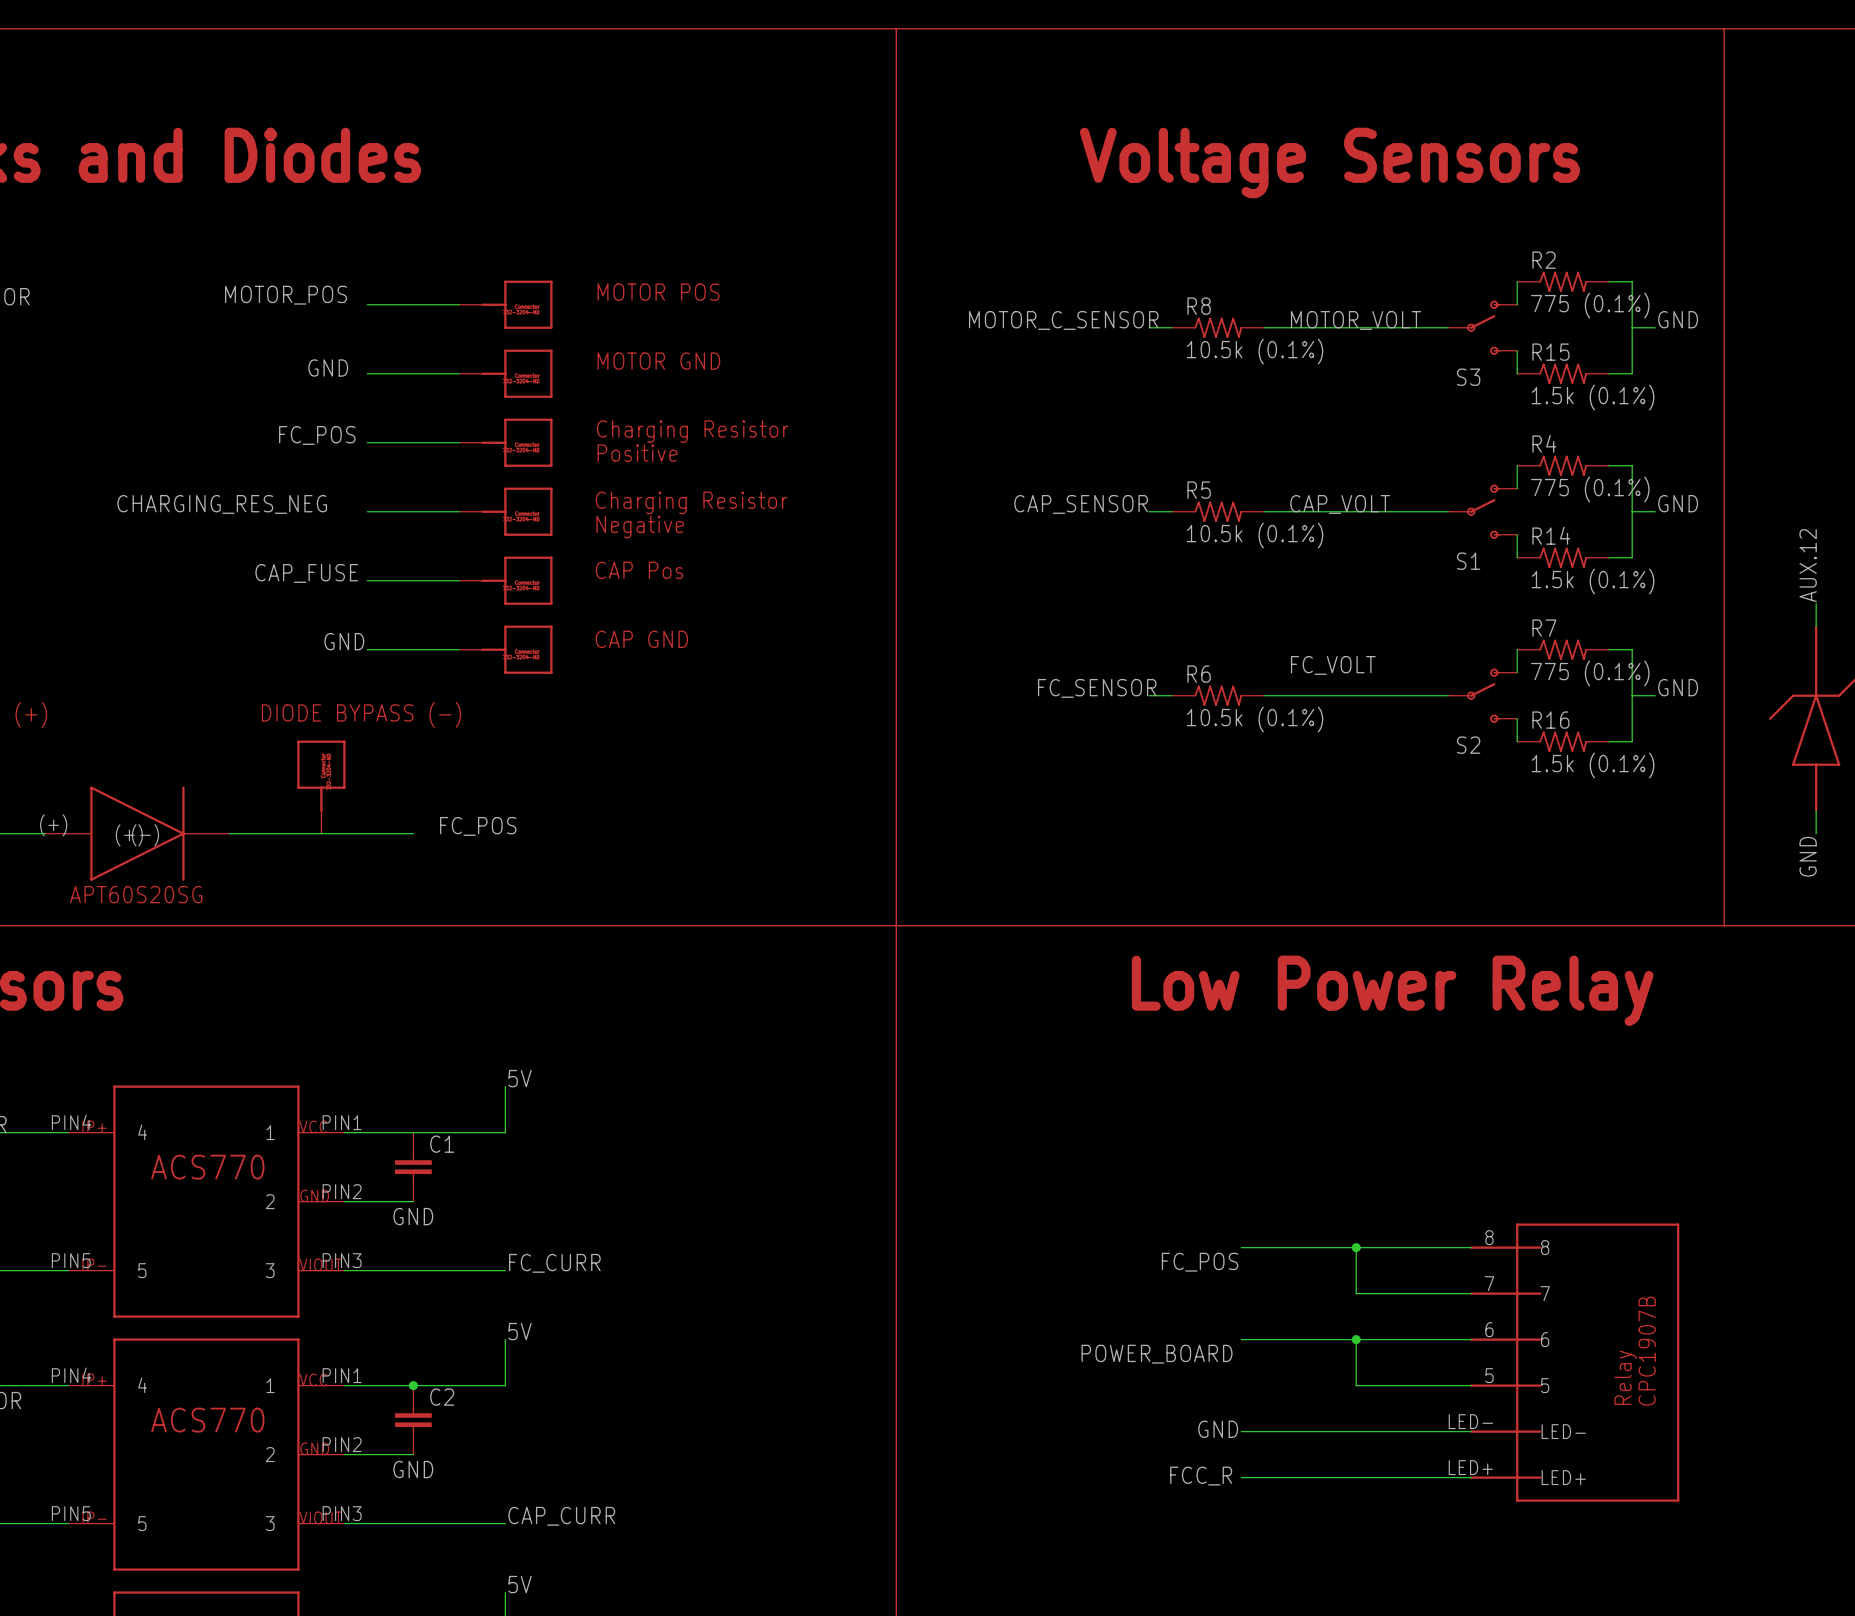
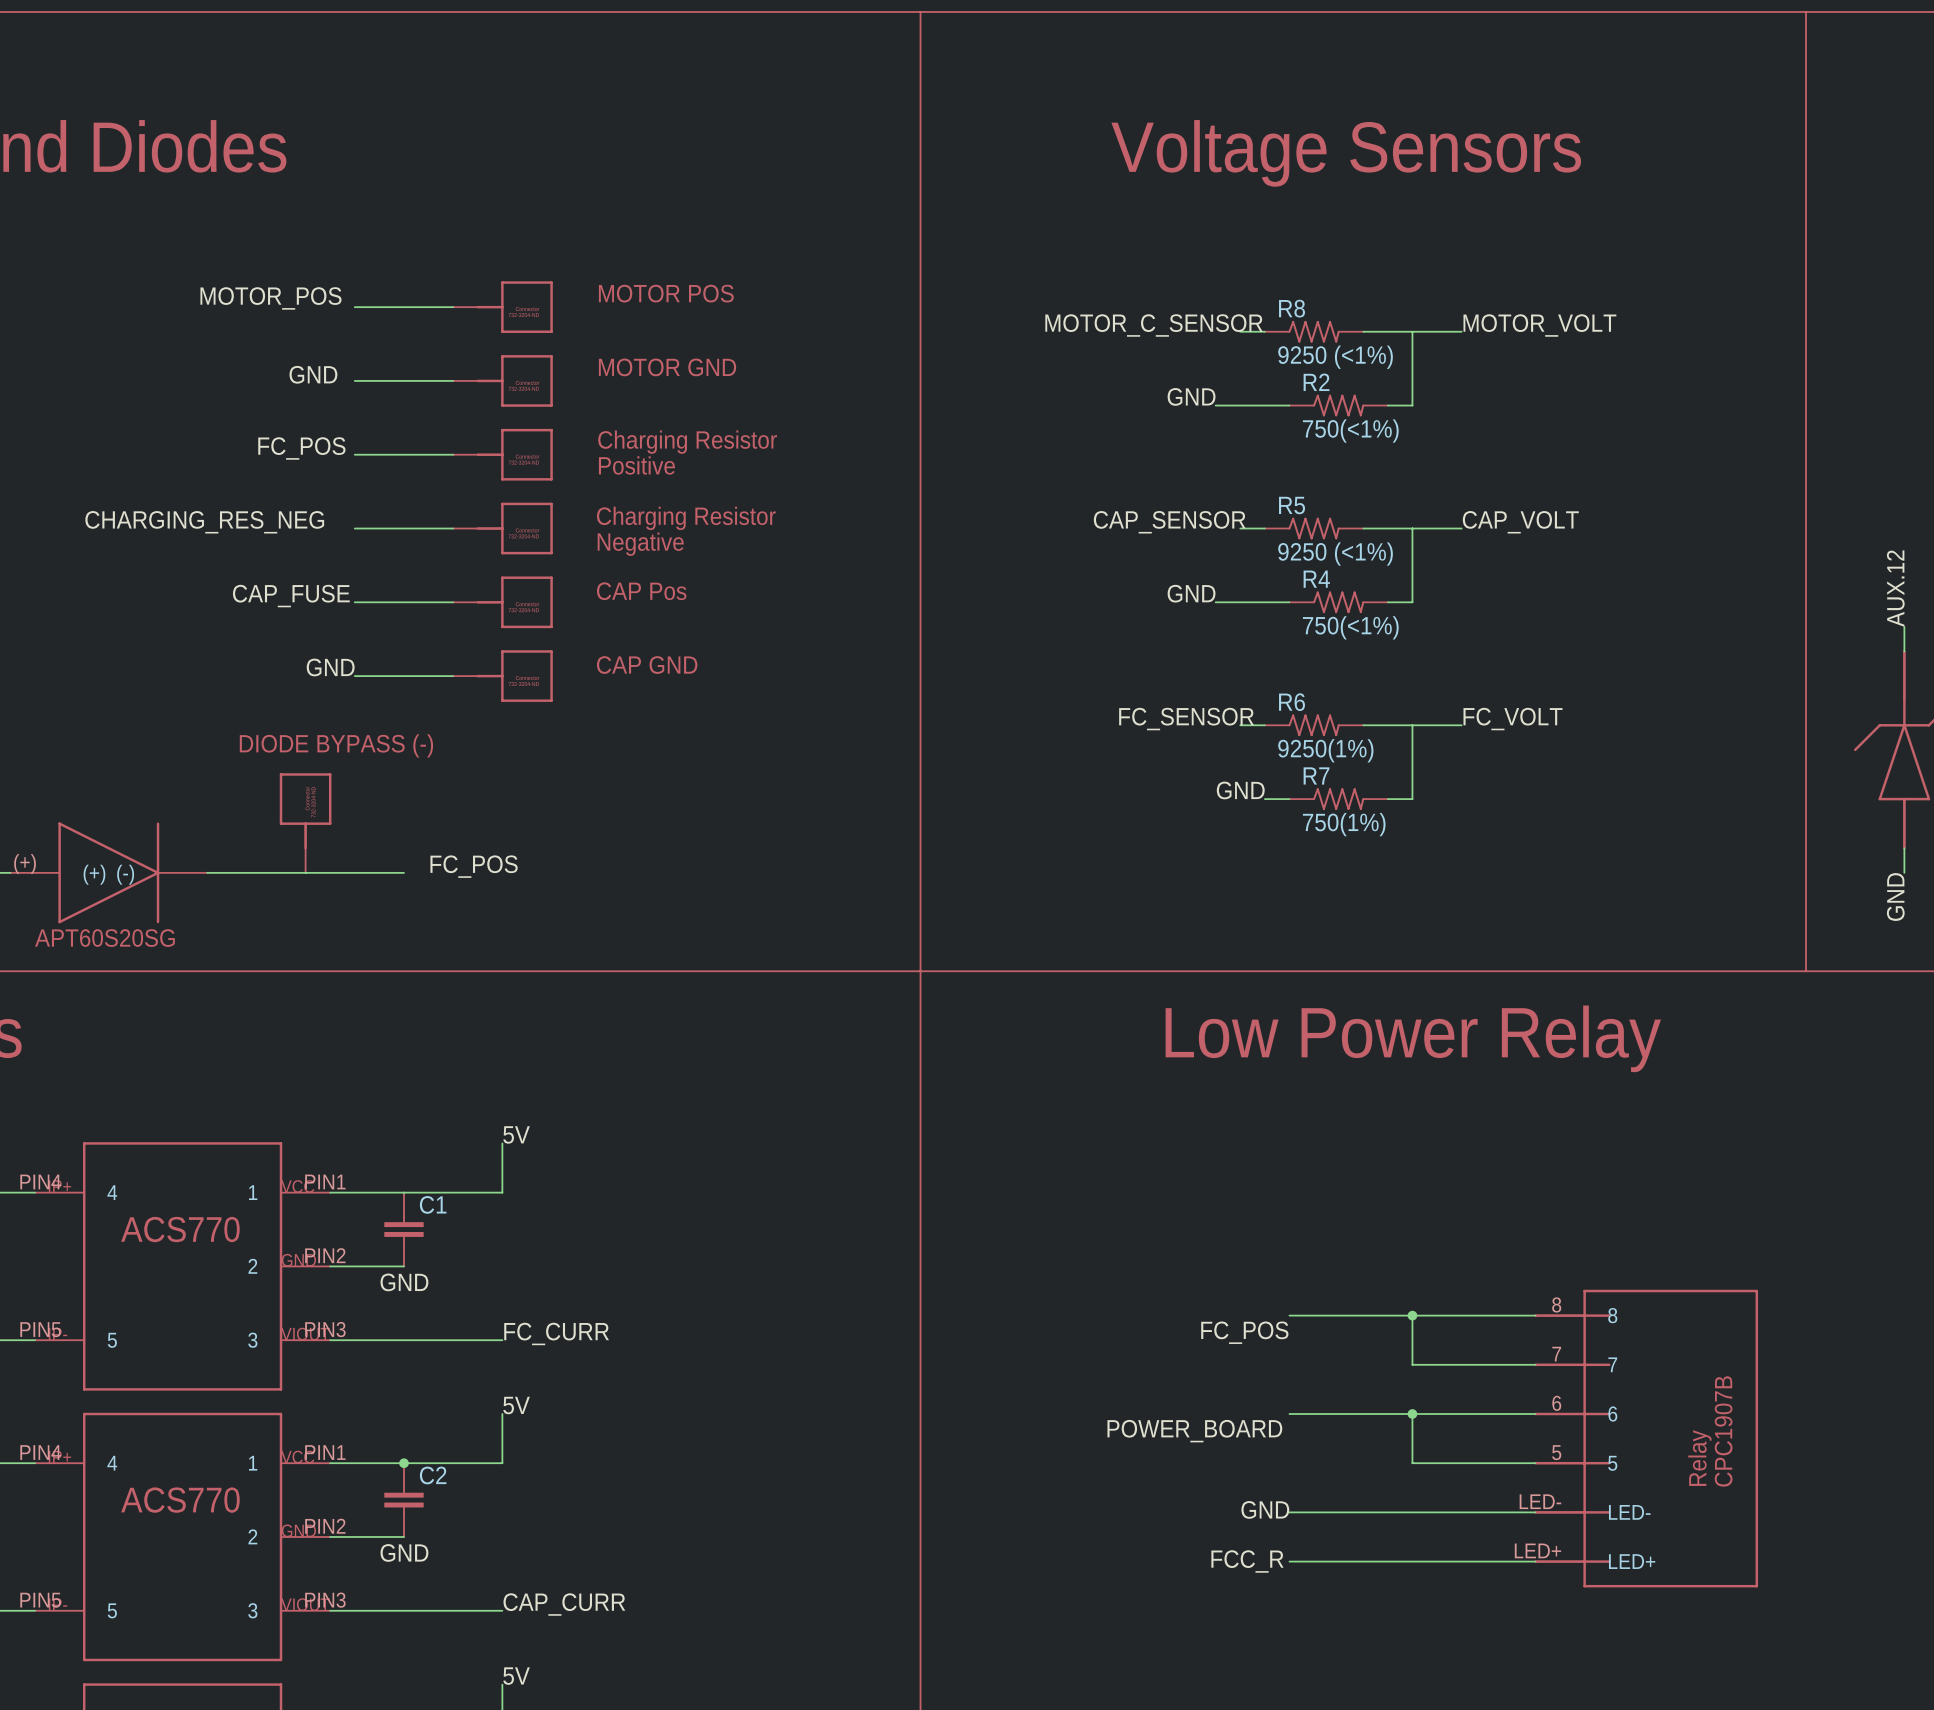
wire: (1517, 281) (1517, 304) -> none
R2 position: (1563, 281) -> (1338, 405)
wire: (1609, 281) (1632, 281) (1632, 373) (1609, 373) -> none
R2 value: 775 (0.1%) (1590, 305) -> 750(<1%) (1350, 431)
label: GND (1678, 319) -> none
label position: MOTOR_C_SENSOR (1063, 320) -> MOTOR_C_SENSOR (1154, 325)
label position: MOTOR_VOLT (1356, 320) -> MOTOR_VOLT (1539, 325)
wire: (1149, 327) (1172, 327) -> (1240, 331) (1264, 331)
R8 position: (1218, 327) -> (1314, 331)
wire: none -> (1412, 331) (1412, 405) (1387, 405)
wire: (1402, 327) (1448, 327) -> none
S3: (1482, 327) -> none
wire: (1632, 327) (1655, 327) -> none
wire: (1517, 350) (1517, 373) -> none
R8 value: 10.5k (0.1%) (1254, 351) -> 9250 (<1%) (1335, 357)
R15: 1.5k (0.1%) (1563, 373) -> none
label: none -> GND (1191, 396)
wire: none -> (1215, 405) (1289, 405)
wire: (1517, 465) (1517, 488) -> none
R4 position: (1563, 465) -> (1338, 602)
wire: (1609, 465) (1632, 465) (1632, 557) (1609, 557) -> none
R4 value: 775 (0.1%) (1590, 489) -> 750(<1%) (1350, 627)
label: GND (1678, 503) -> none
label position: CAP_SENSOR (1081, 504) -> CAP_SENSOR (1169, 522)
label position: CAP_VOLT (1340, 504) -> CAP_VOLT (1520, 522)
wire: (1149, 511) (1172, 511) -> (1240, 528) (1264, 528)
R5 position: (1218, 511) -> (1314, 528)
wire: none -> (1412, 528) (1412, 602) (1387, 602)
wire: (1402, 511) (1448, 511) -> none
S1: (1482, 511) -> none
wire: (1632, 511) (1655, 511) -> none
wire: (1517, 534) (1517, 557) -> none
R5 value: 10.5k (0.1%) (1254, 535) -> 9250 (<1%) (1335, 554)
R14: 1.5k (0.1%) (1563, 557) -> none
label: none -> GND (1191, 593)
wire: none -> (1215, 602) (1289, 602)
wire: (1517, 649) (1517, 672) -> none
R7 position: (1563, 649) -> (1338, 799)
wire: (1609, 649) (1632, 649) (1632, 741) (1609, 741) -> none
label position: FC_VOLT (1333, 665) -> FC_VOLT (1513, 719)
R7 value: 775 (0.1%) (1590, 673) -> 750(1%) (1344, 824)
label: GND (1678, 687) -> none
label position: FC_SENSOR (1097, 688) -> FC_SENSOR (1186, 719)
wire: (1149, 695) (1172, 695) -> (1240, 725) (1264, 725)
R6 position: (1218, 695) -> (1314, 725)
wire: none -> (1412, 725) (1412, 799) (1387, 799)
wire: (1402, 695) (1448, 695) -> none
S2: (1482, 695) -> none
wire: (1632, 695) (1655, 695) -> none
wire: (1517, 718) (1517, 741) -> none
R6 value: 10.5k (0.1%) (1254, 719) -> 9250(1%) (1325, 750)
R16: 1.5k (0.1%) (1563, 741) -> none
label: none -> GND (1240, 790)
wire: none -> (1264, 799) (1289, 799)

